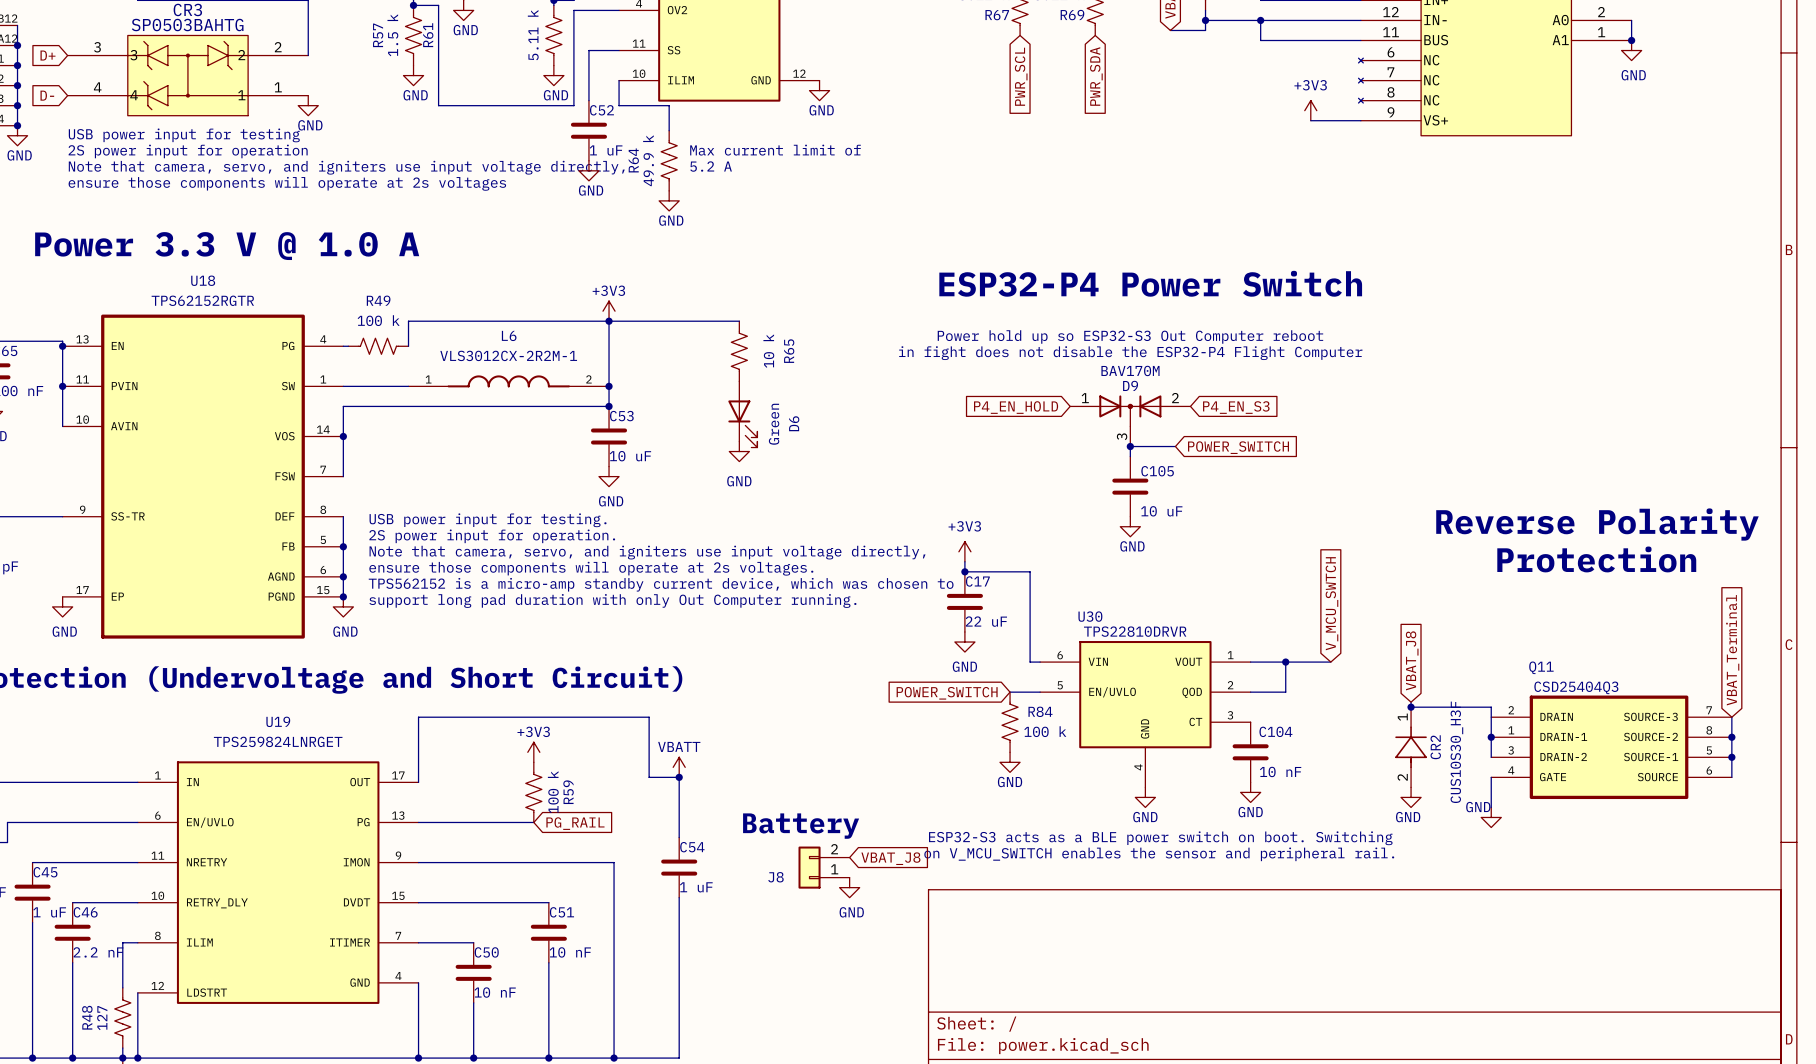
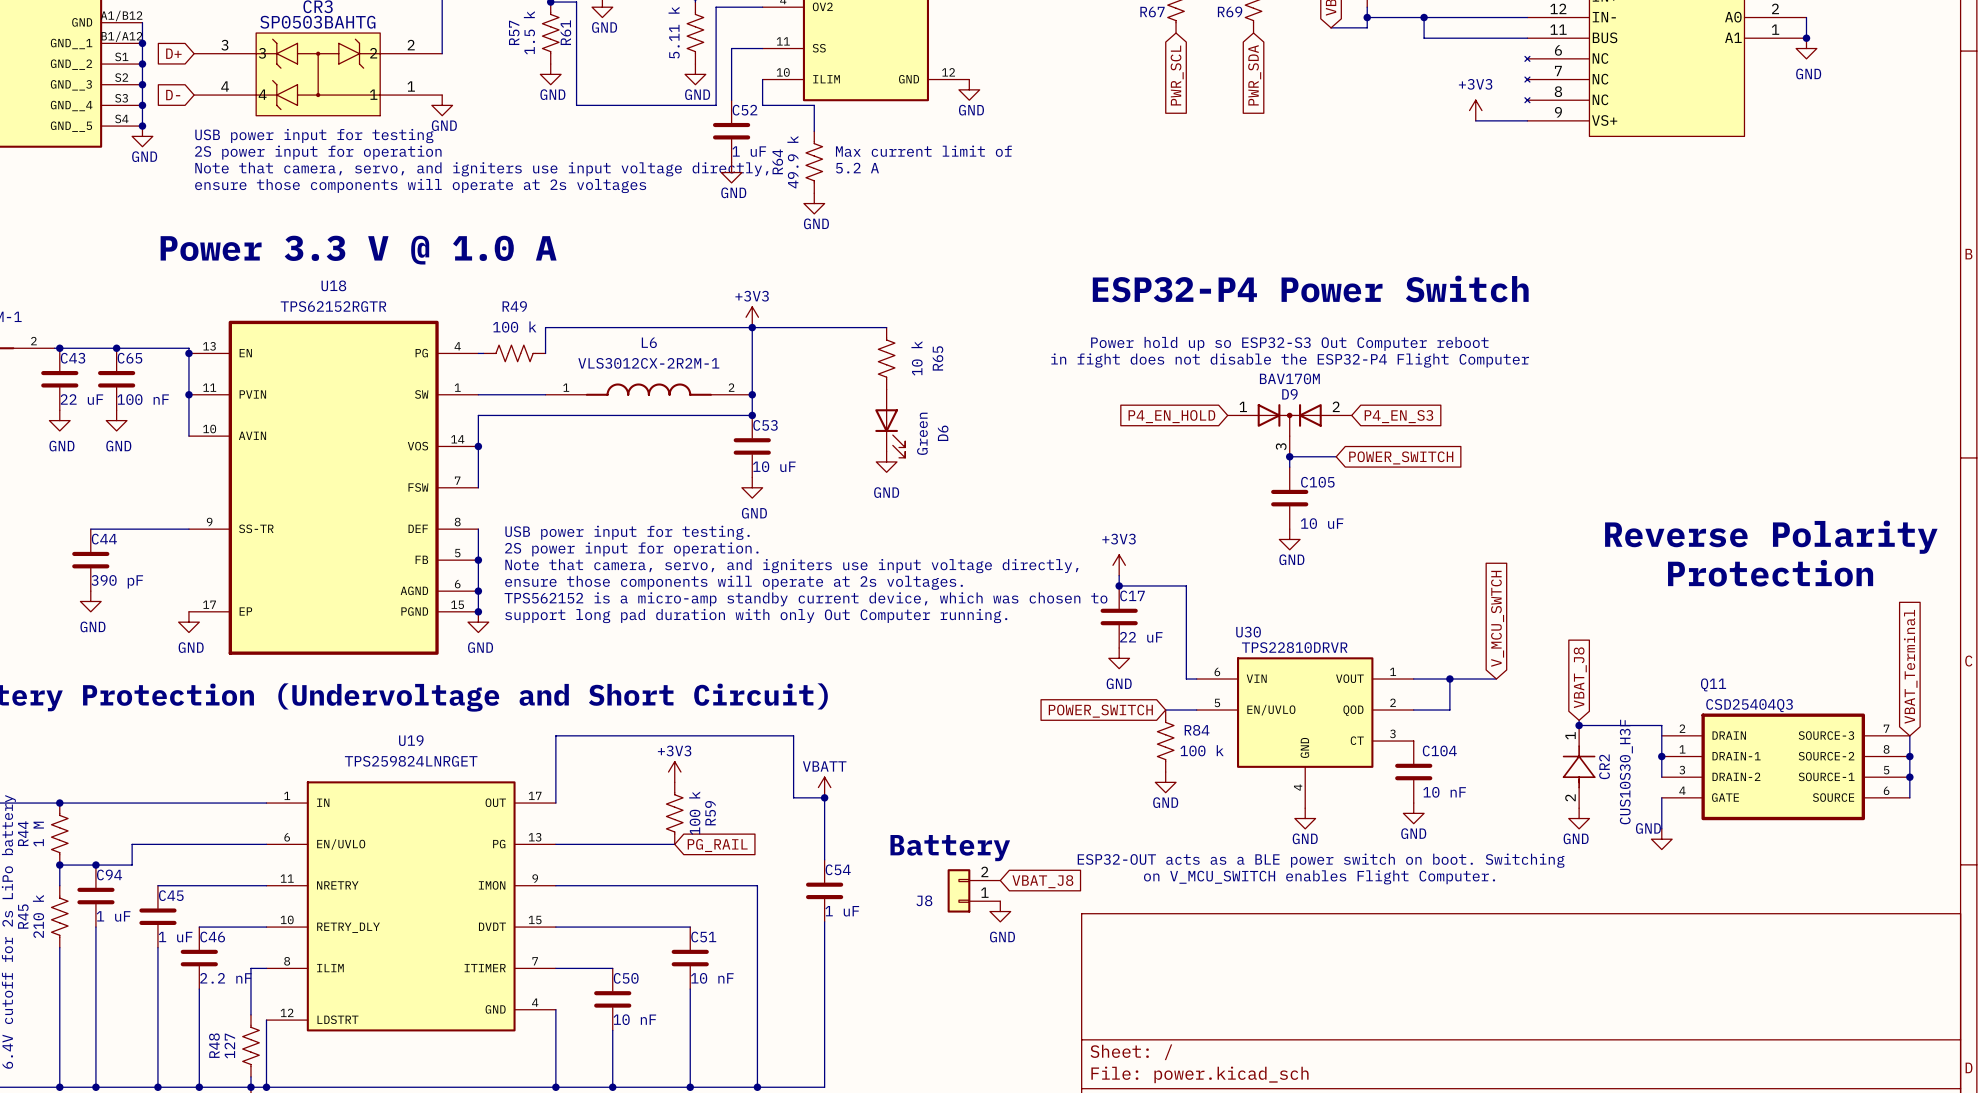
text: ESP32-S3 acts as a BLE power switch on boot. Switching (1160, 838) -> ESP32-OUT acts as a BLE power switch on boot. Switching (1321, 860)
text: on V_MCU_SWITCH enables the sensor and peripheral rail. (1159, 854) -> on V_MCU_SWITCH enables Flight Computer. (1319, 877)

